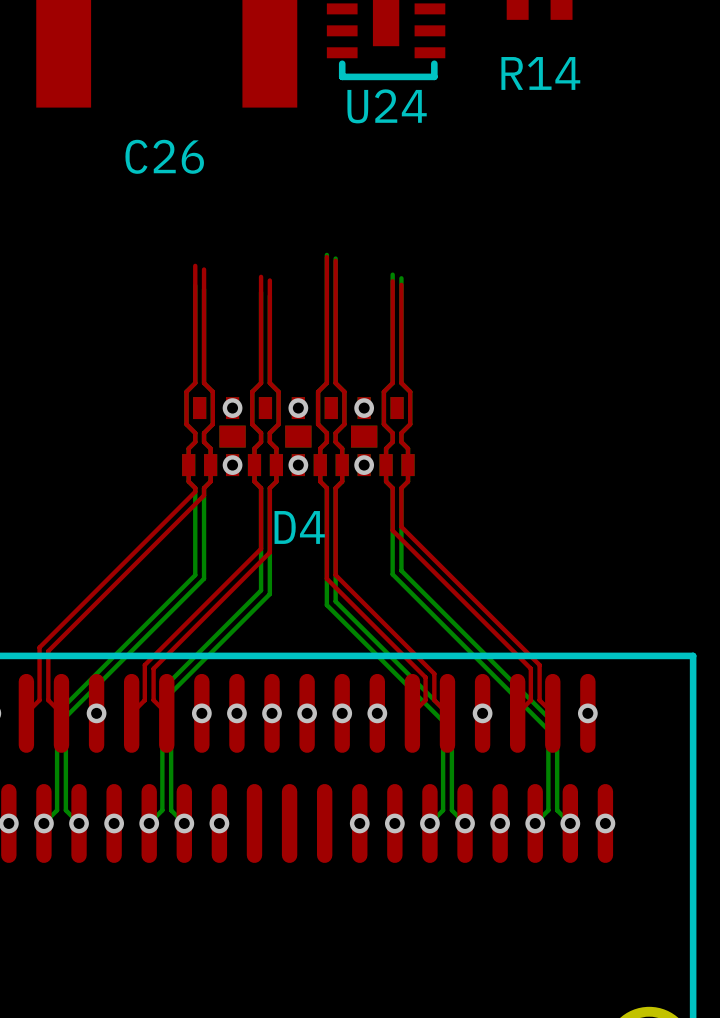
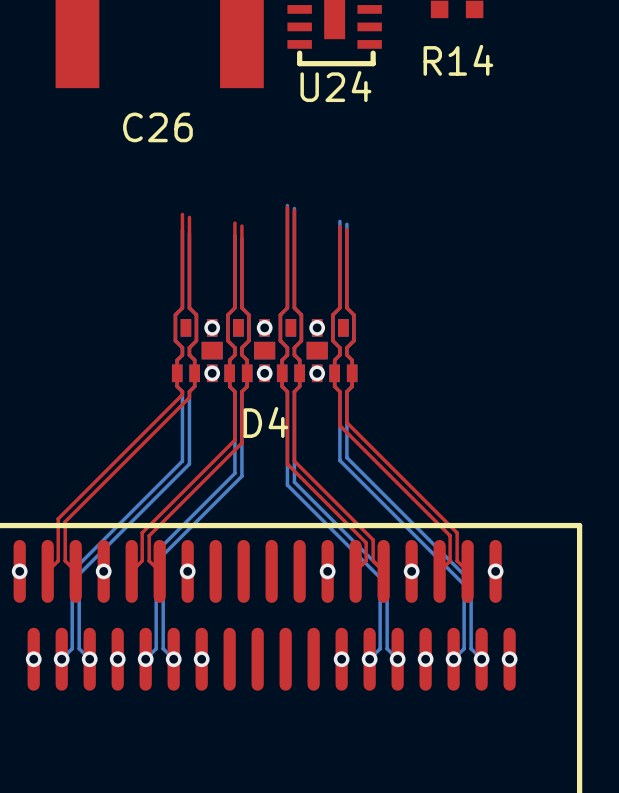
via: (236, 713) -> none
via: (272, 713) -> none
via: (307, 713) -> none
via: (342, 713) -> none
via: (359, 823) -> none

